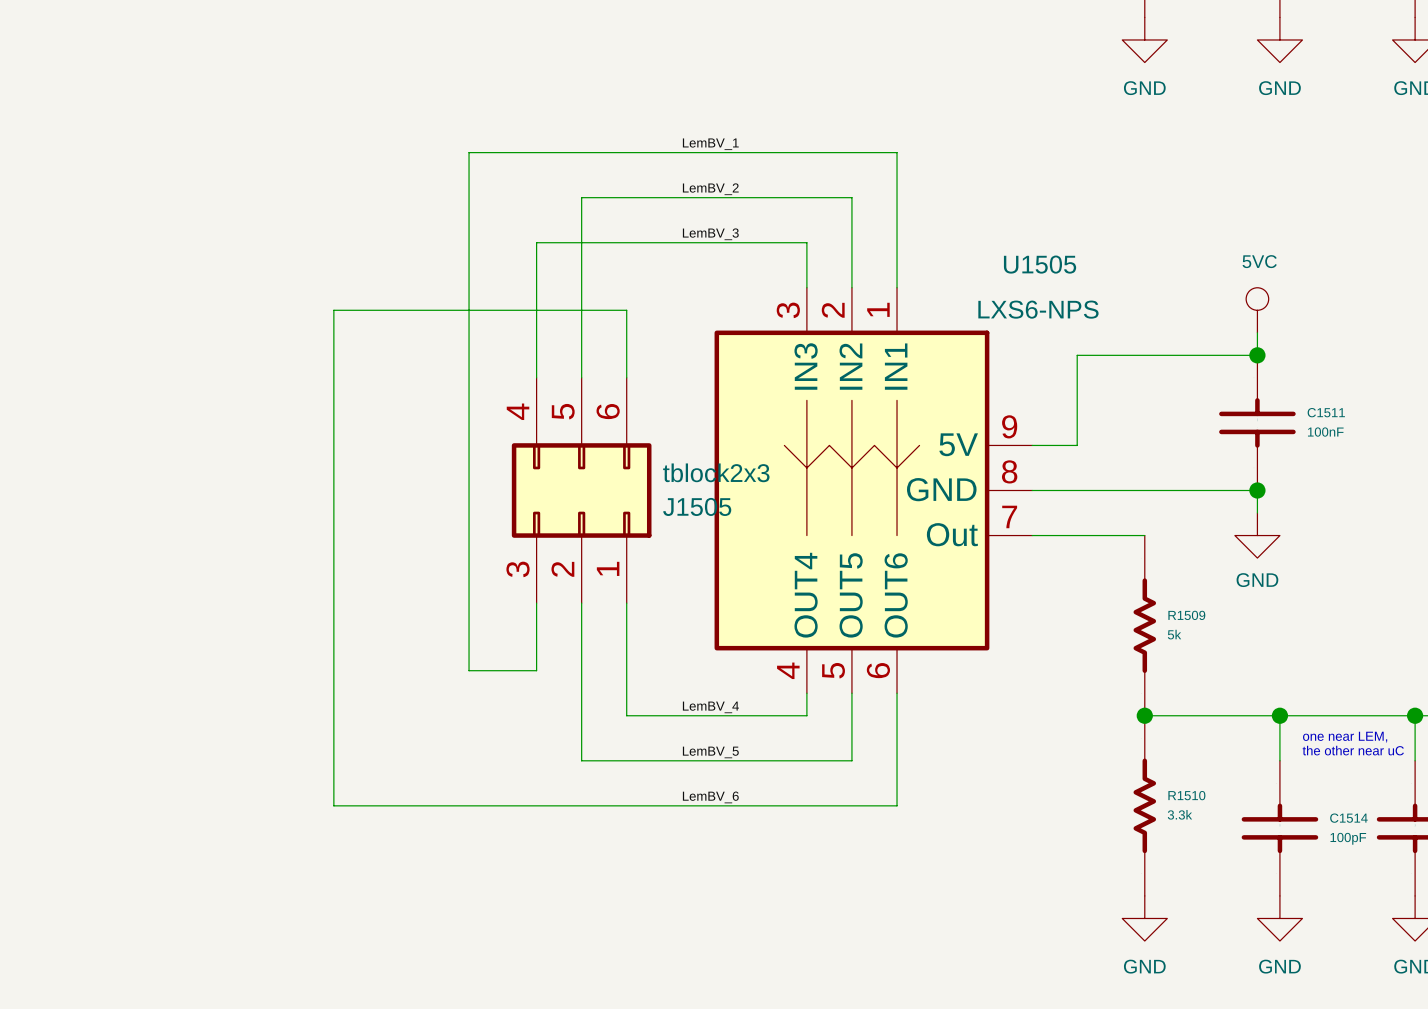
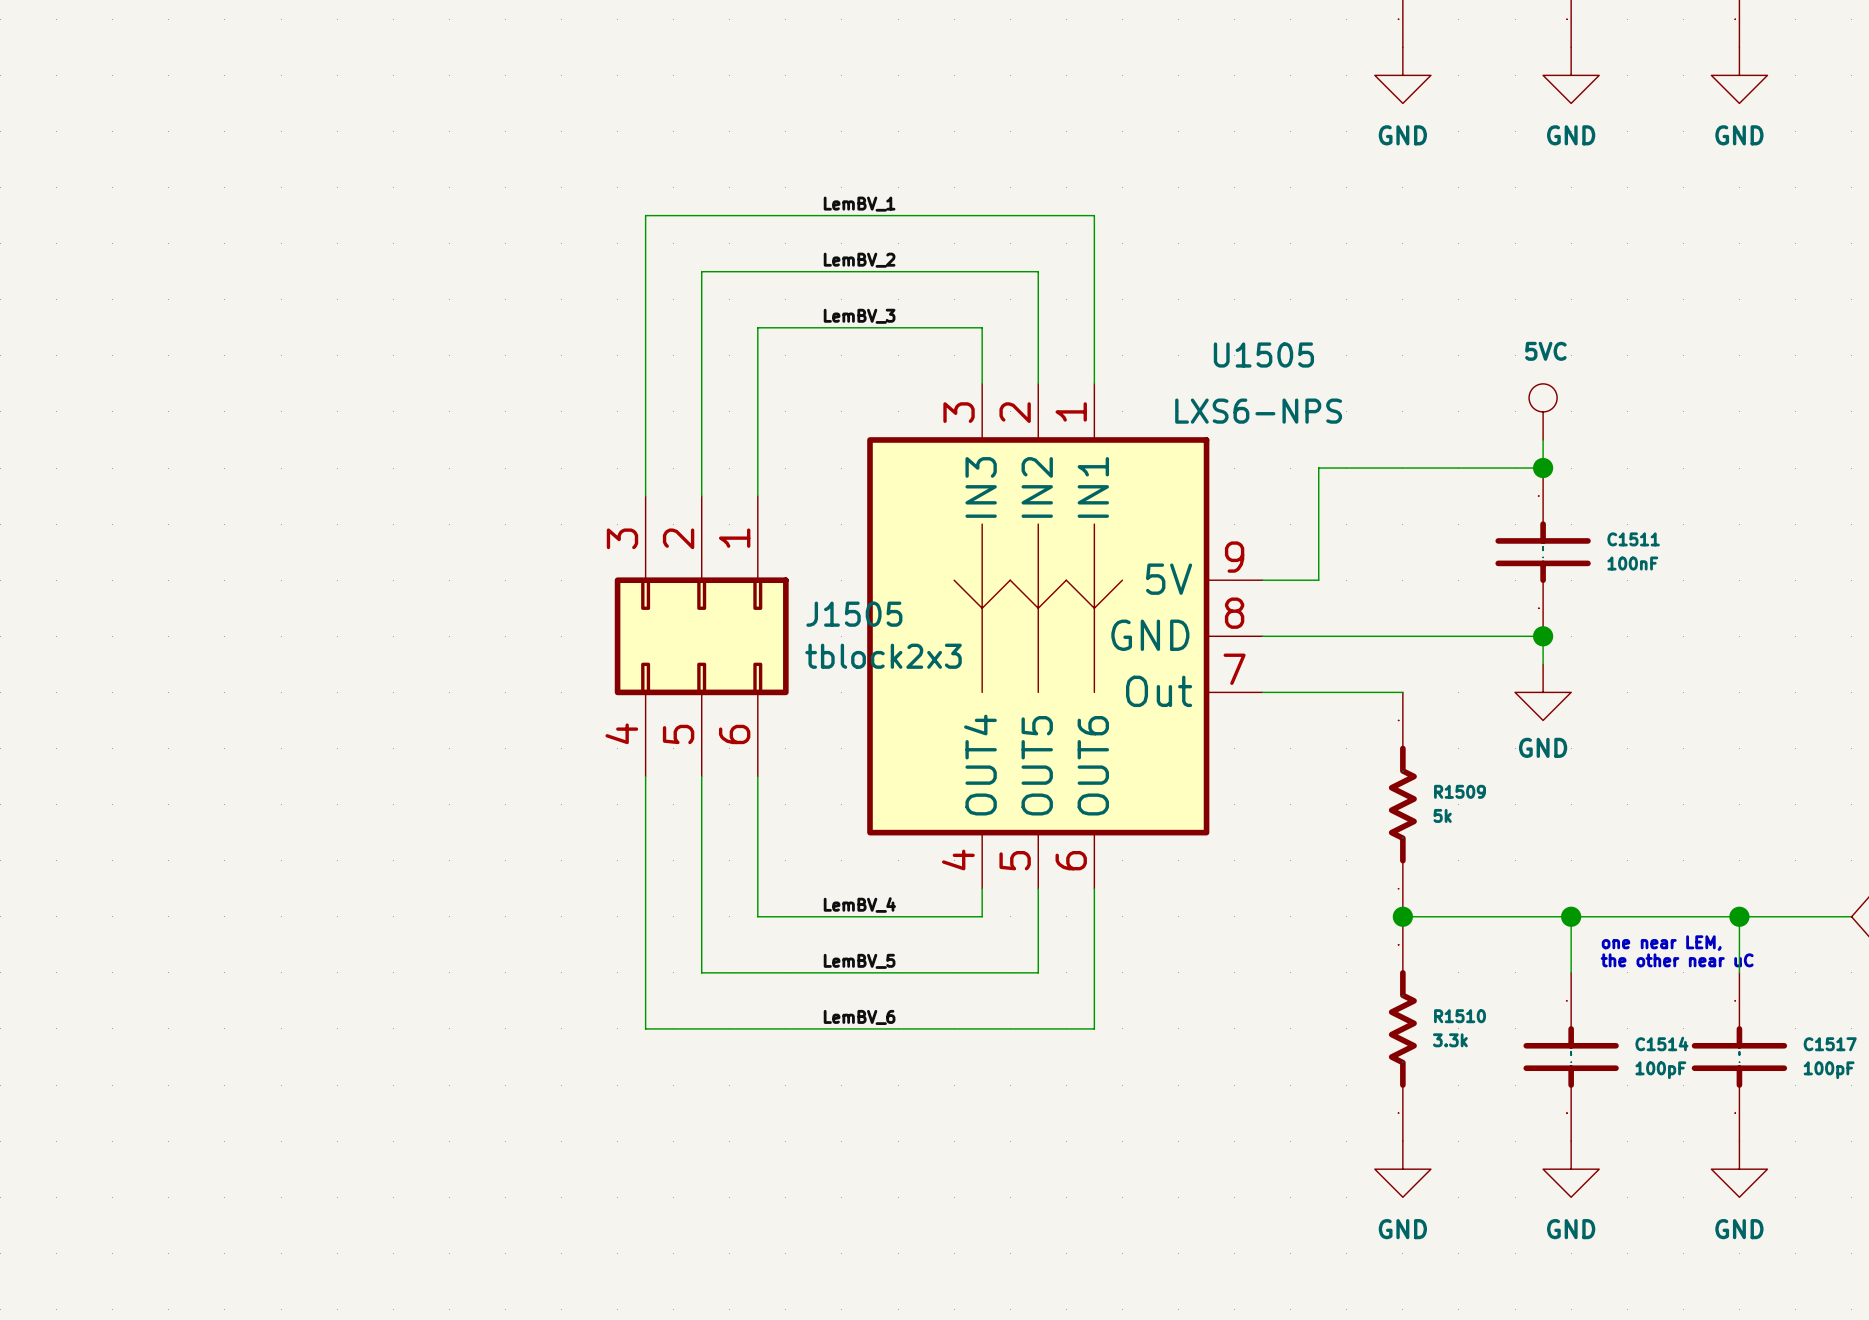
wire: (536, 152) (469, 152) (469, 670) (536, 670) -> (645, 215) (645, 327)
wire: (536, 242) (626, 242) -> (757, 411) (757, 327)
wire: (626, 310) (333, 310) (333, 805) (536, 805) -> (645, 860) (645, 1028)
J1505 flip: as is (581, 490) -> up-down (701, 636)

